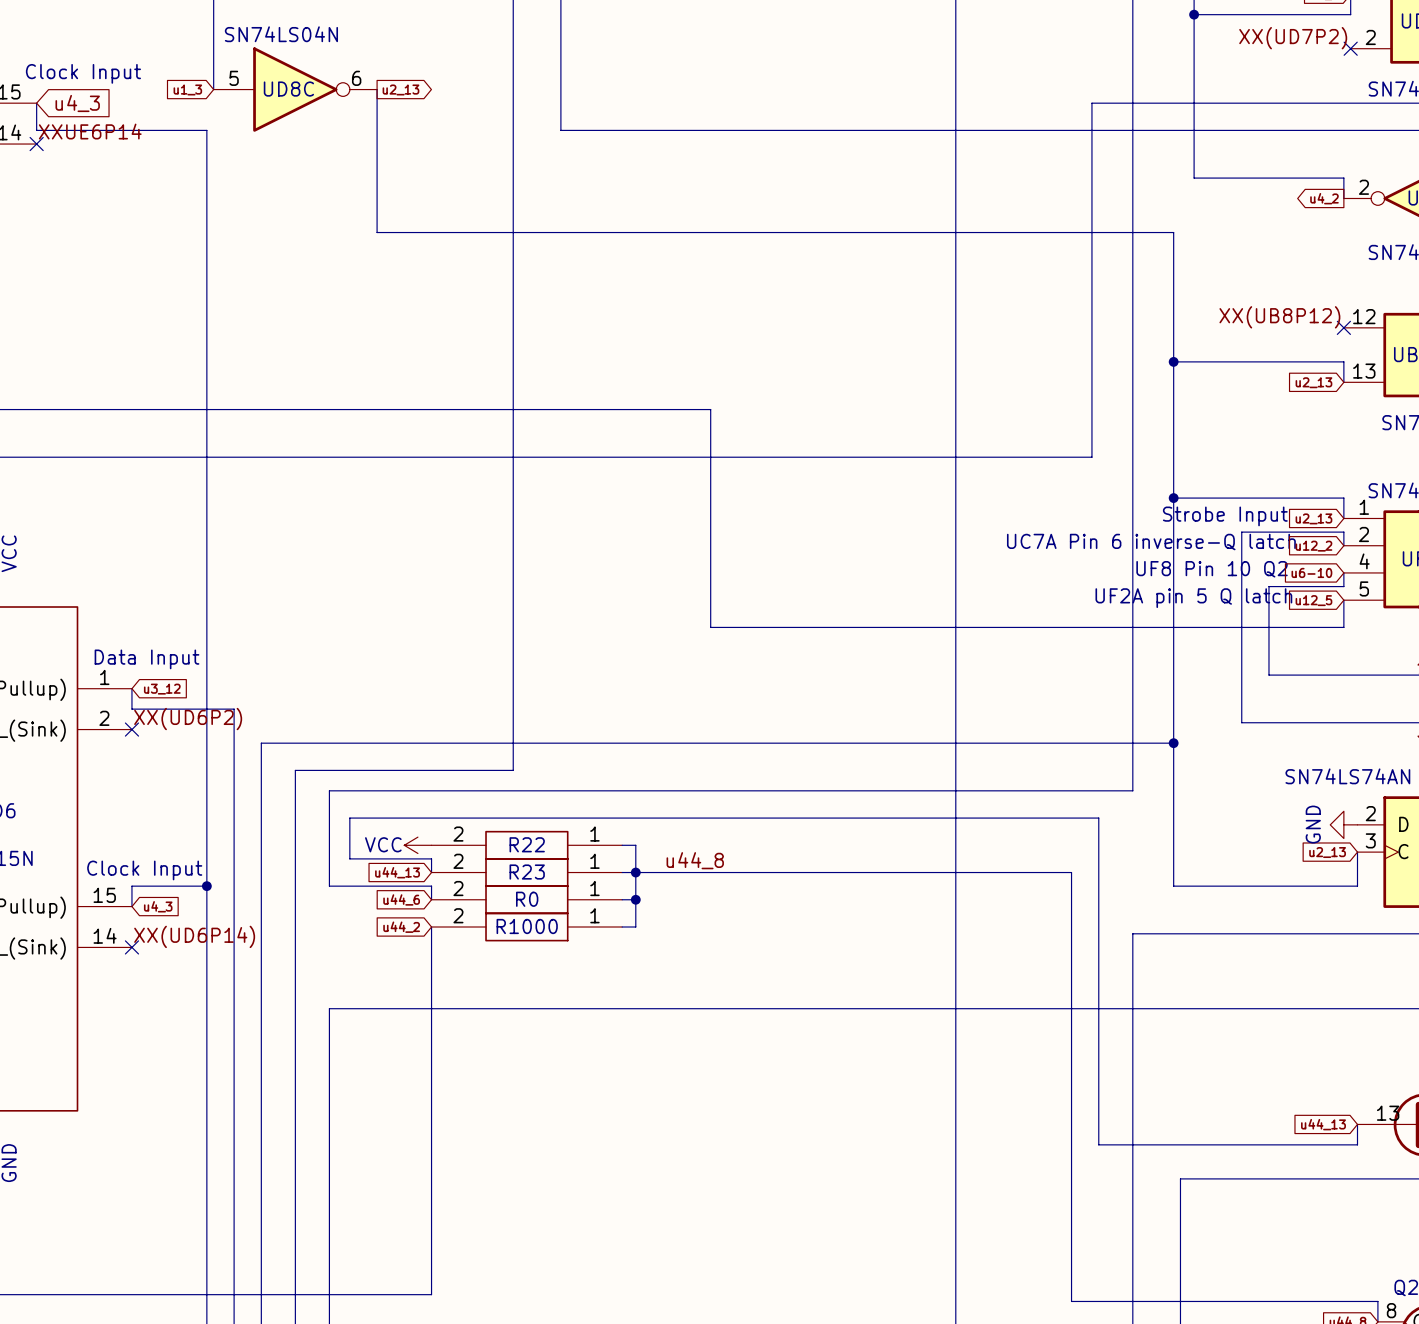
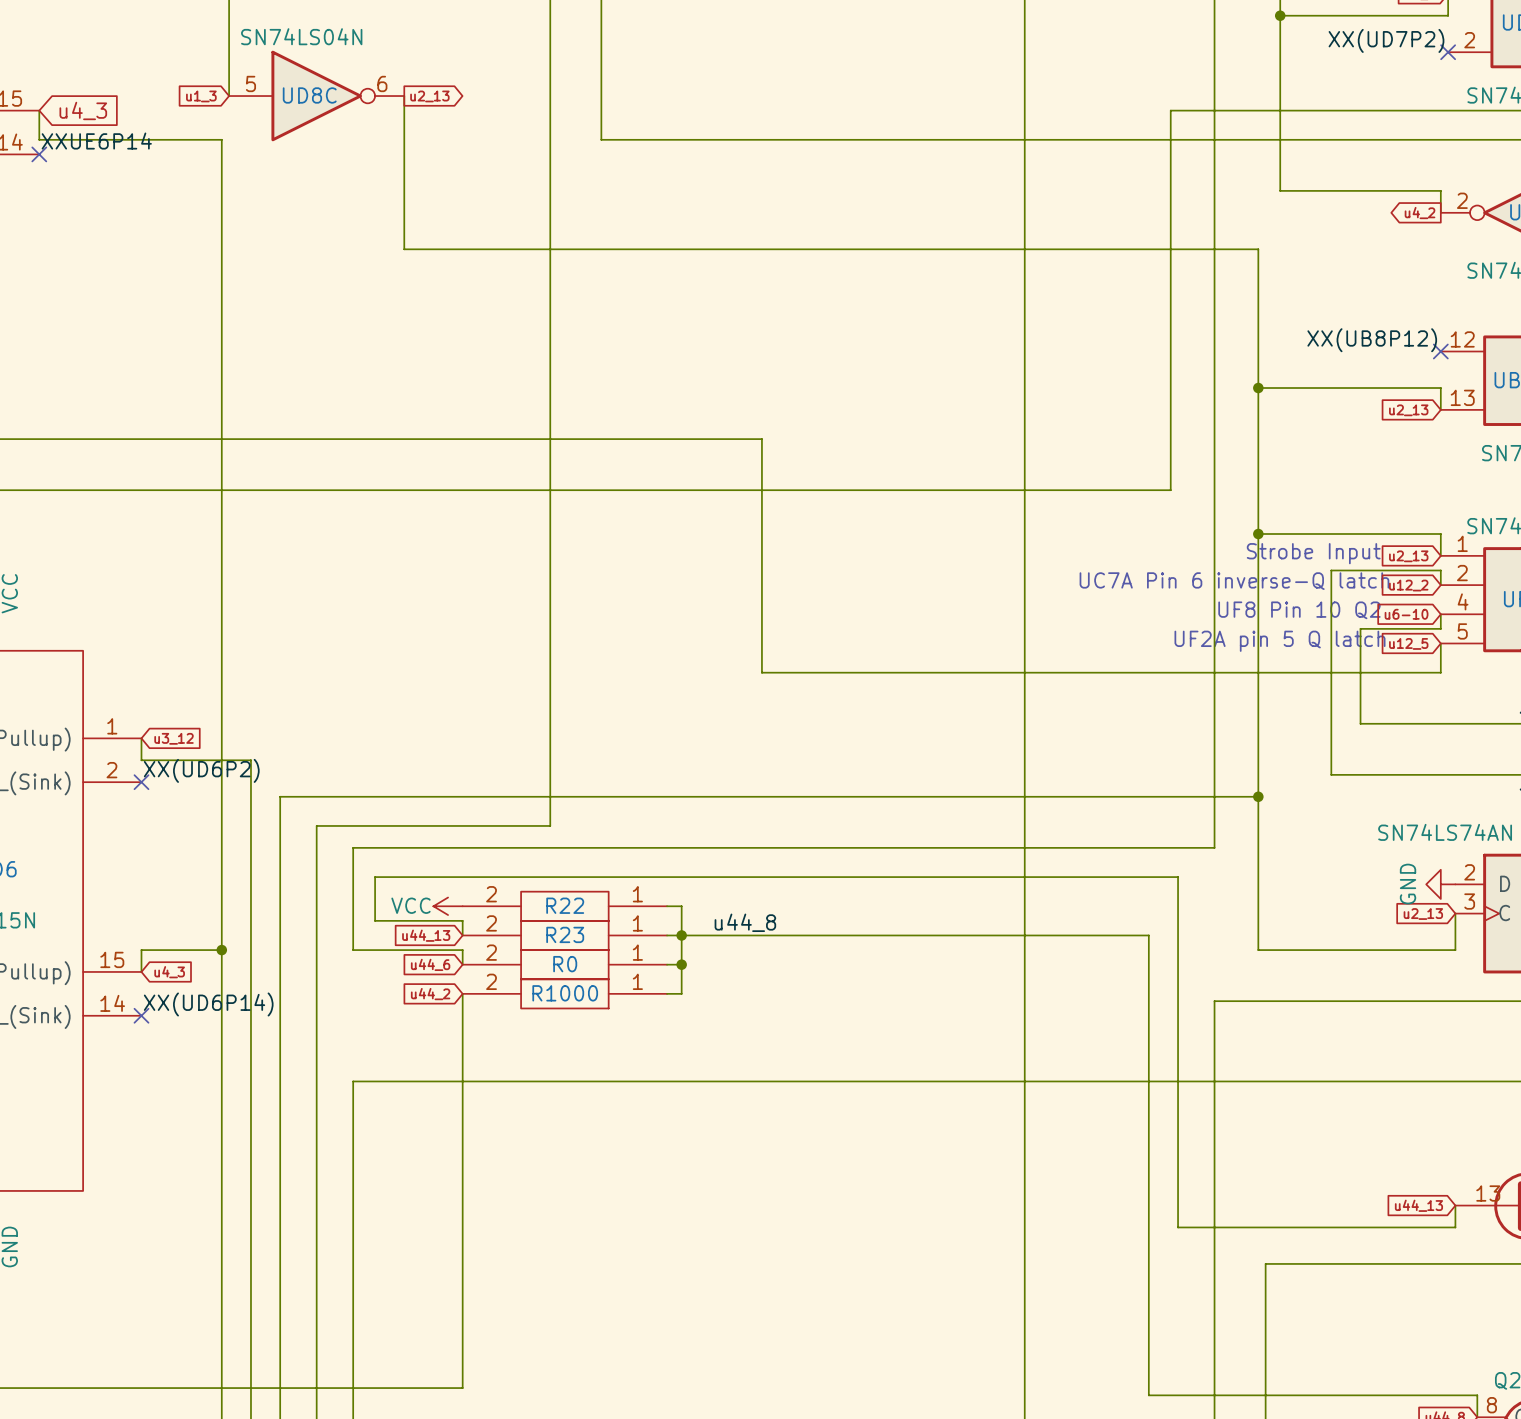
text: Clock Input (83, 73) -> none
text: Data Input (146, 659) -> none
text: Clock Input (144, 870) -> none

